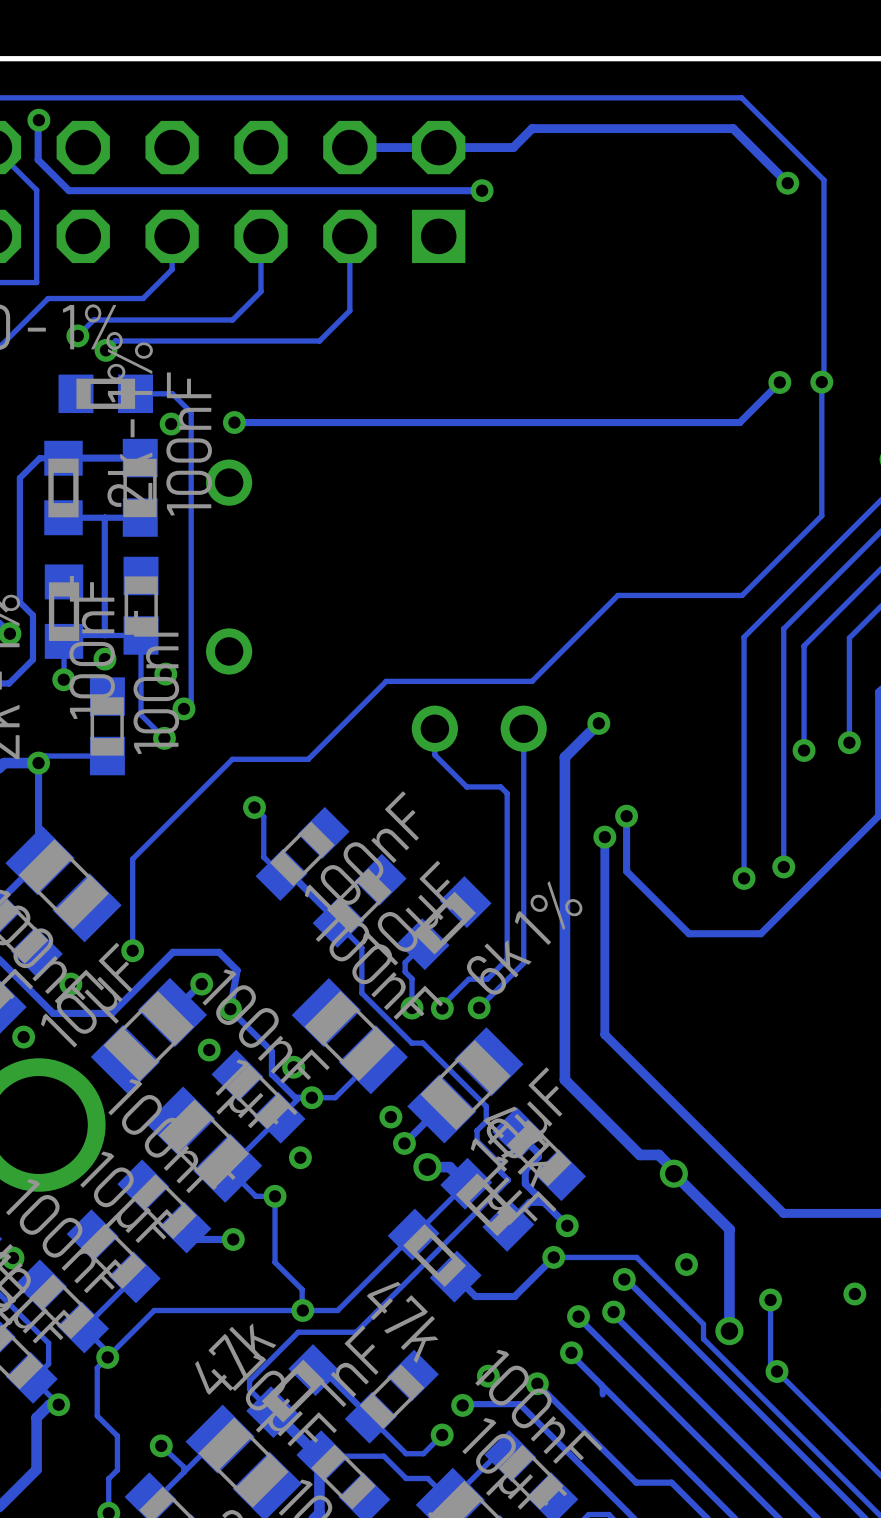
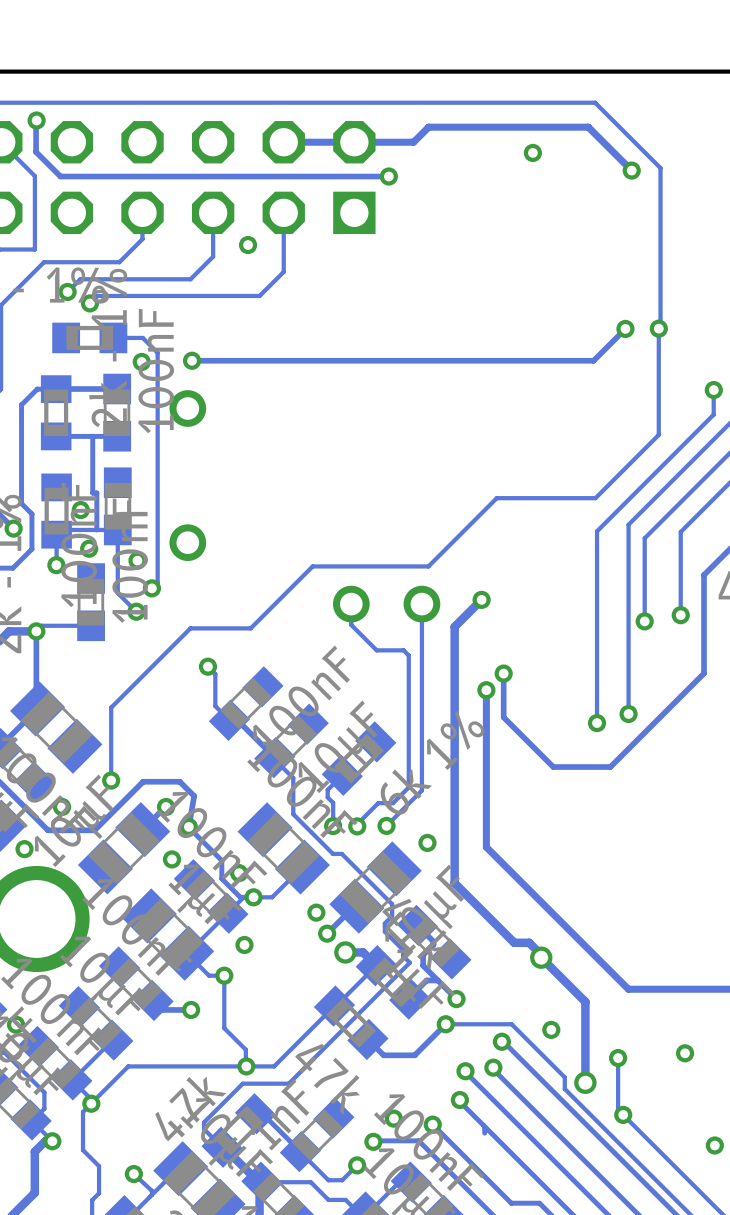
via: none -> (532, 152)
via: none -> (248, 245)
track: (104, 517) (104, 635) -> none
track: none -> (92, 436) (92, 493) (96, 493) (96, 529)
via: none -> (80, 510)
via: none -> (427, 842)

